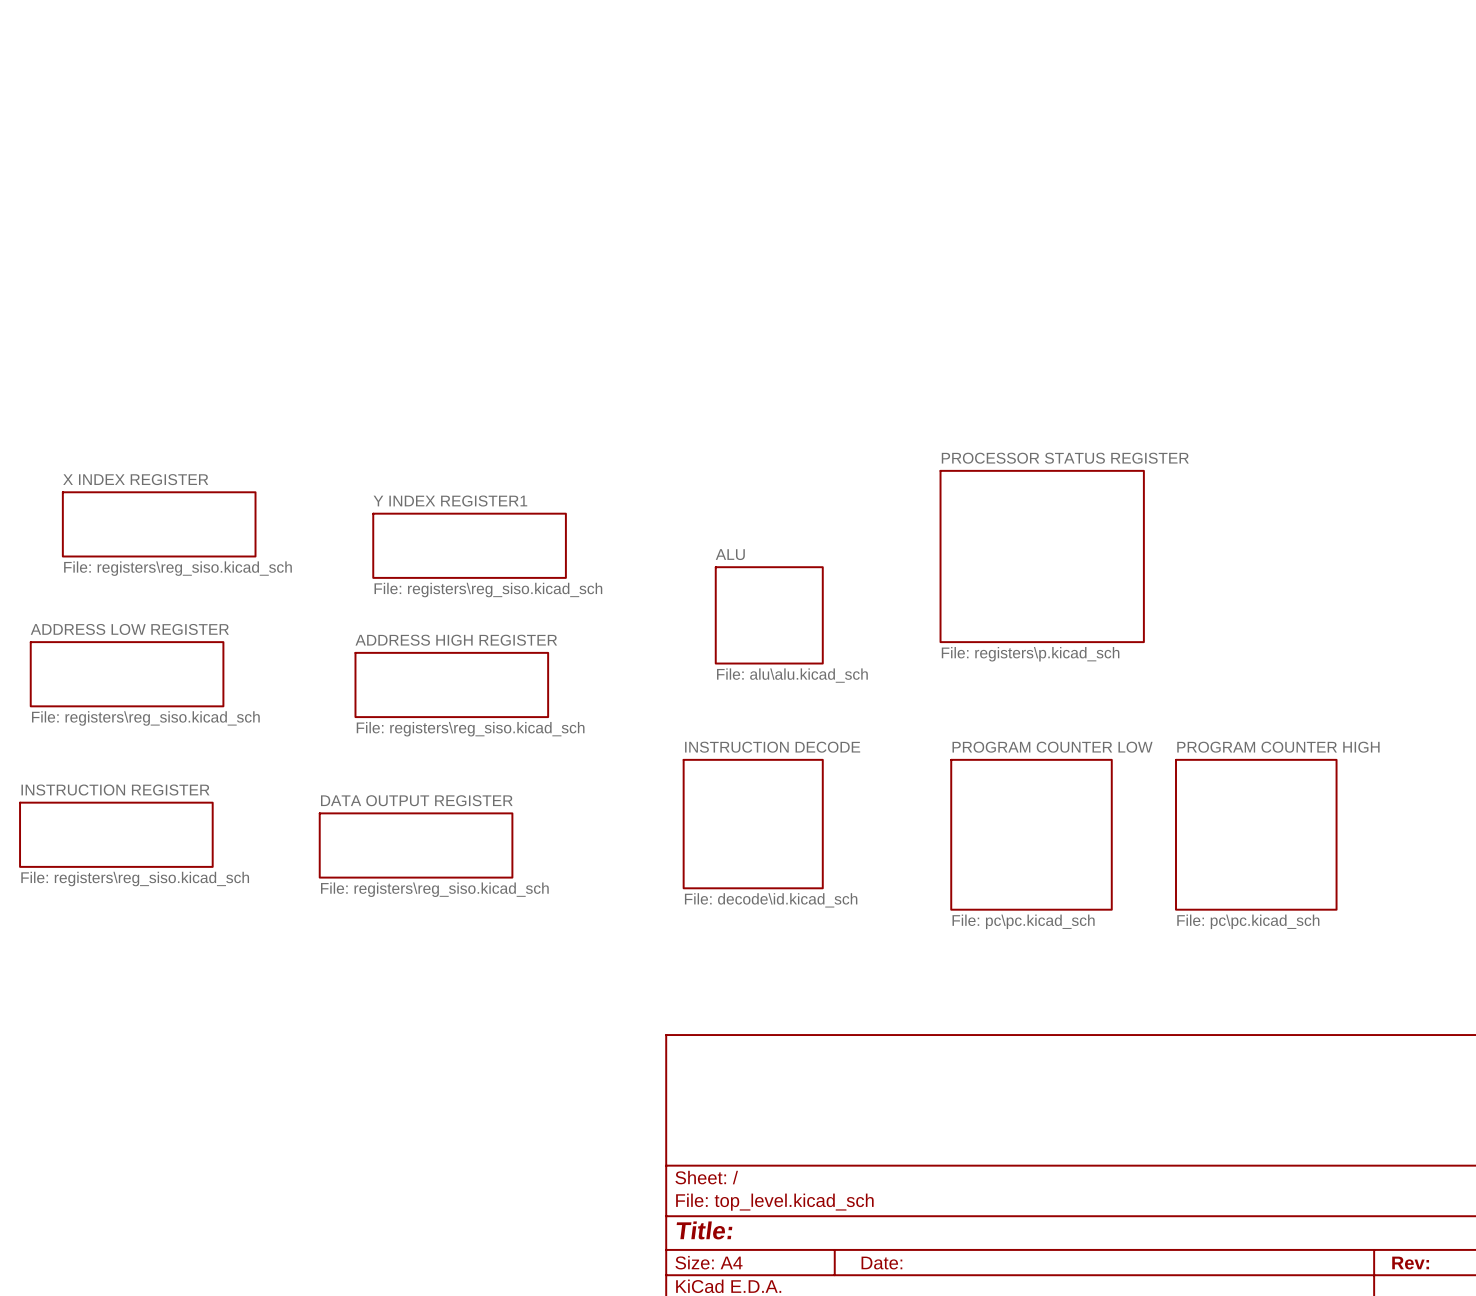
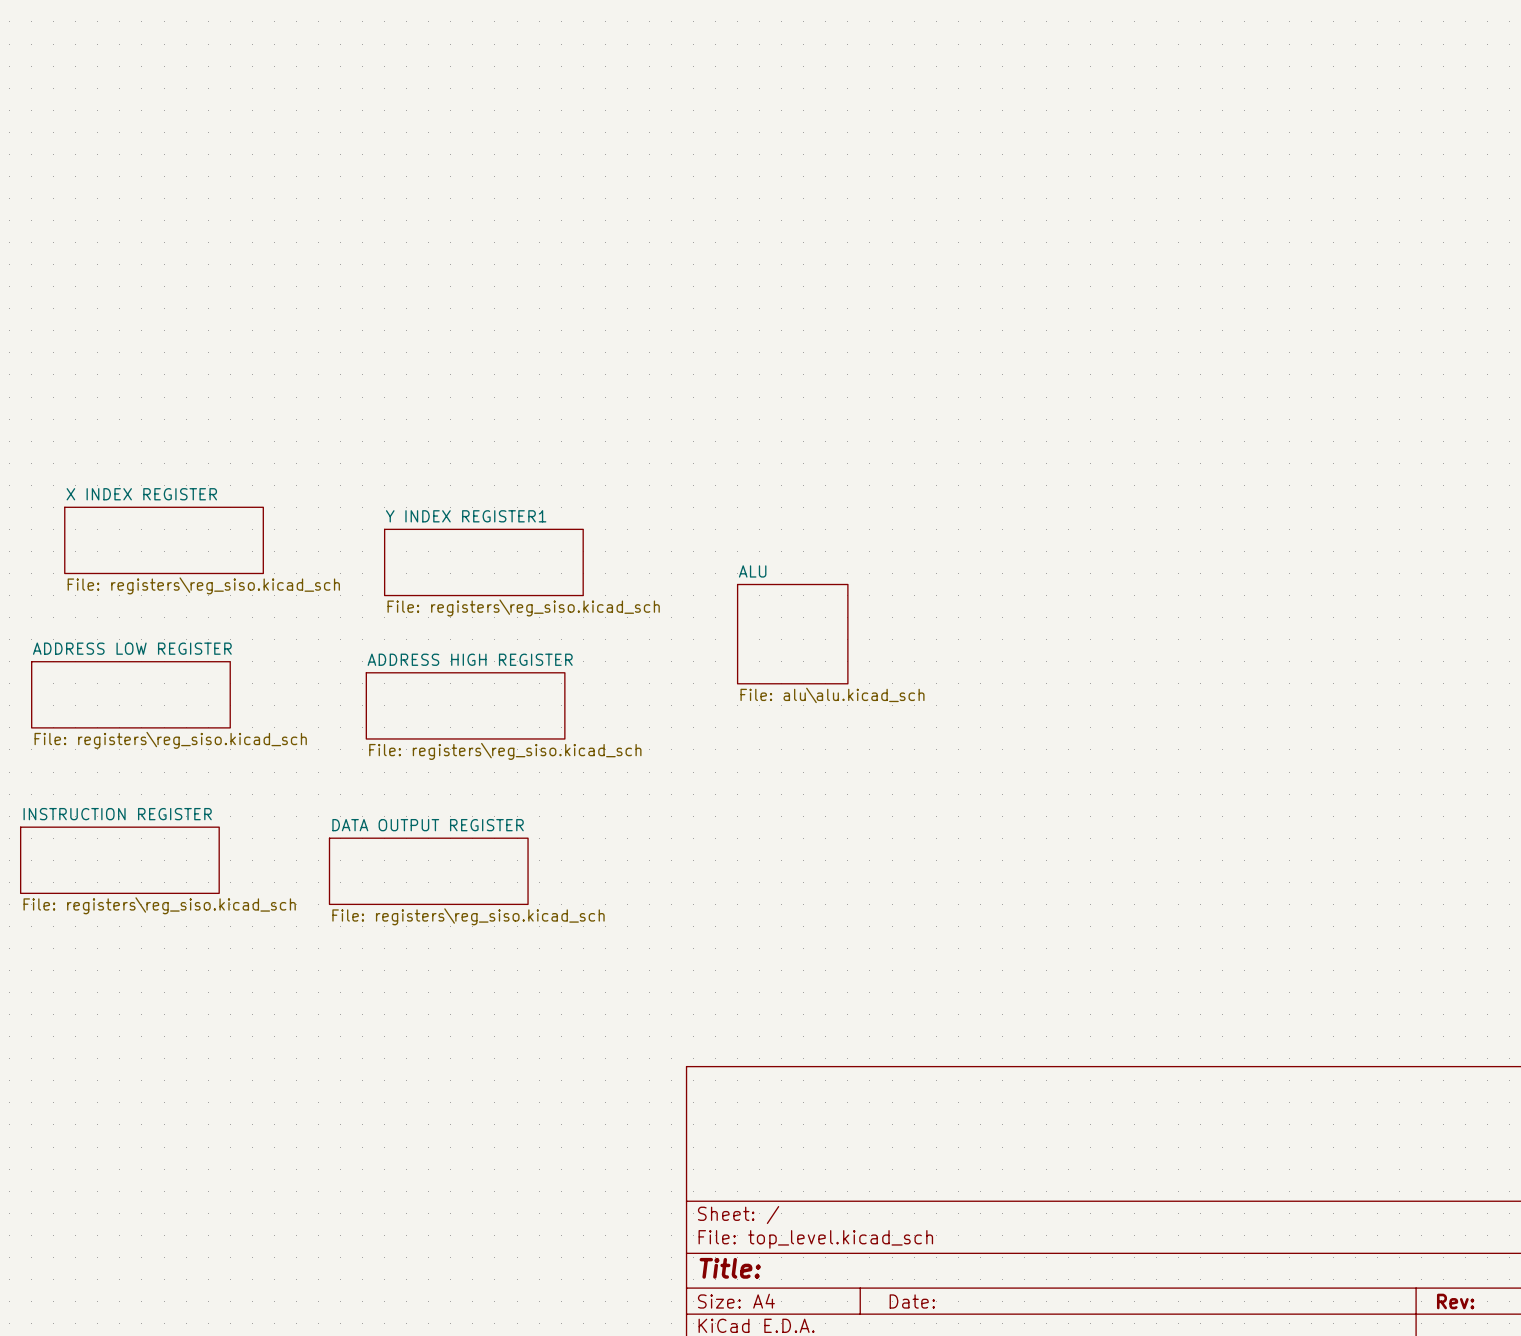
sheet PROCESSOR STATUS REGISTER: File: registers\p.kicad_sch (1042, 556) -> none
sheet INSTRUCTION DECODE: File: decode\id.kicad_sch (753, 824) -> none
sheet PROGRAM COUNTER LOW: File: pc\pc.kicad_sch (1031, 834) -> none
sheet PROGRAM COUNTER HIGH: File: pc\pc.kicad_sch (1256, 834) -> none

